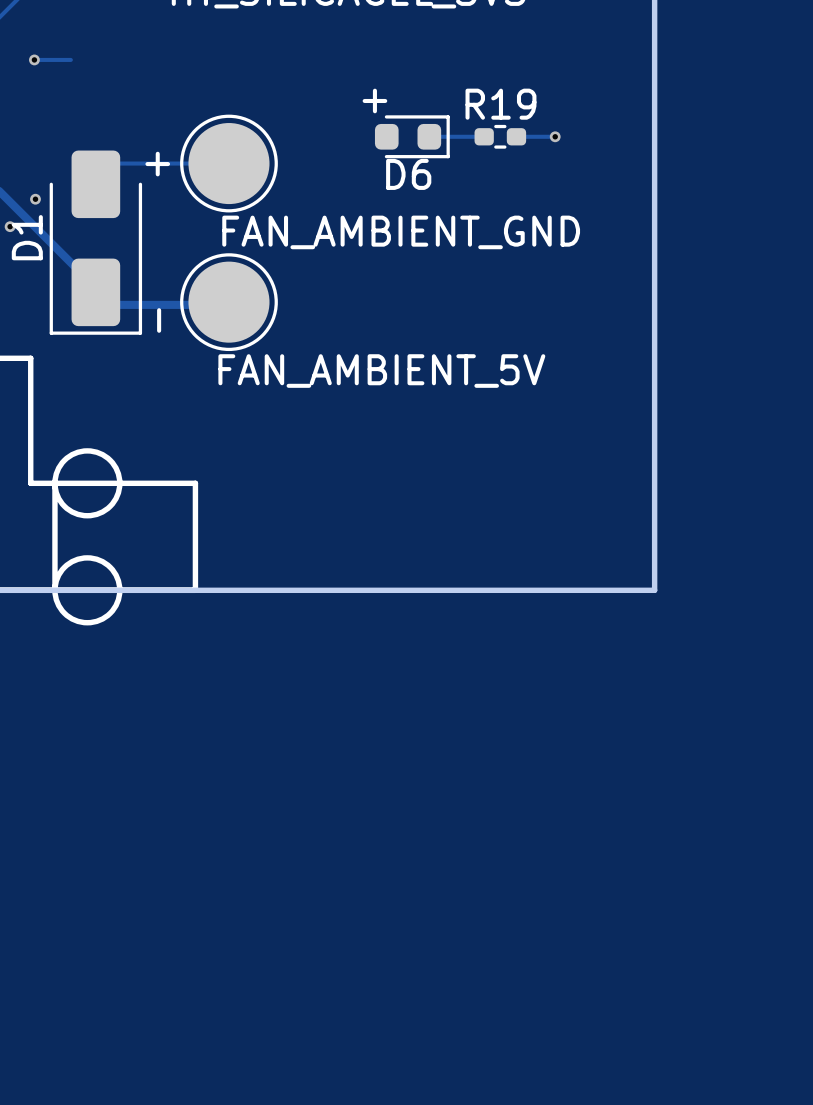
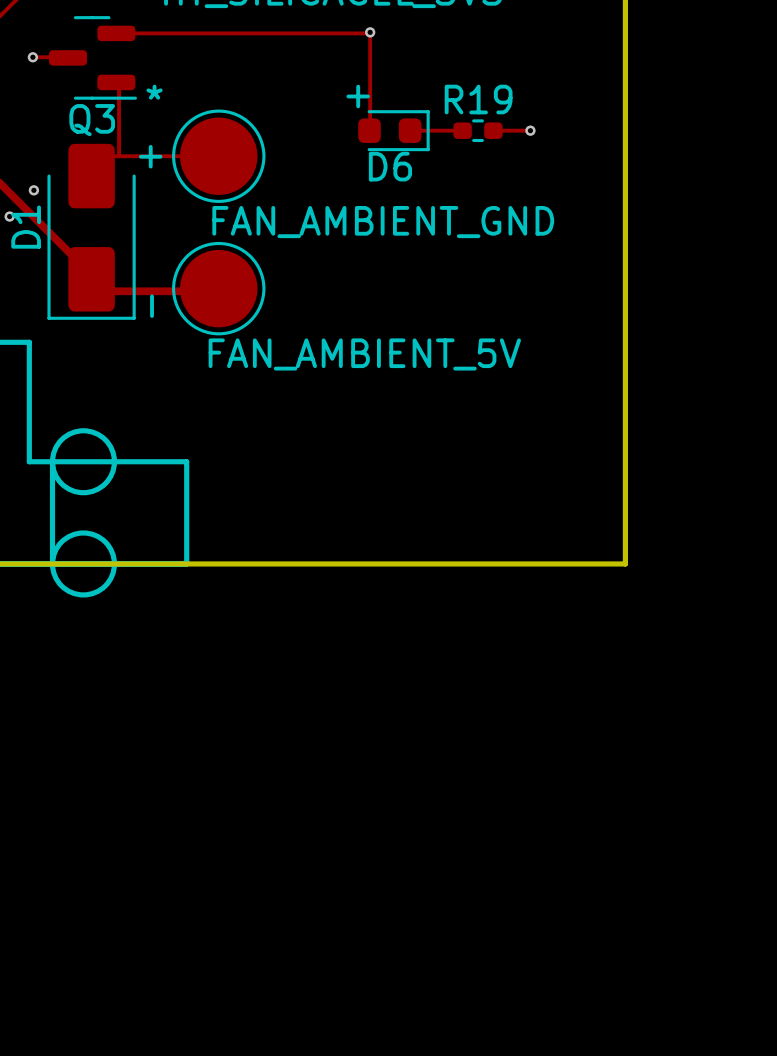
via: none -> (370, 32)
track: none -> (119, 33) (370, 32) (370, 130)
Q3: none -> (92, 57)
track: none -> (119, 82) (119, 156)

